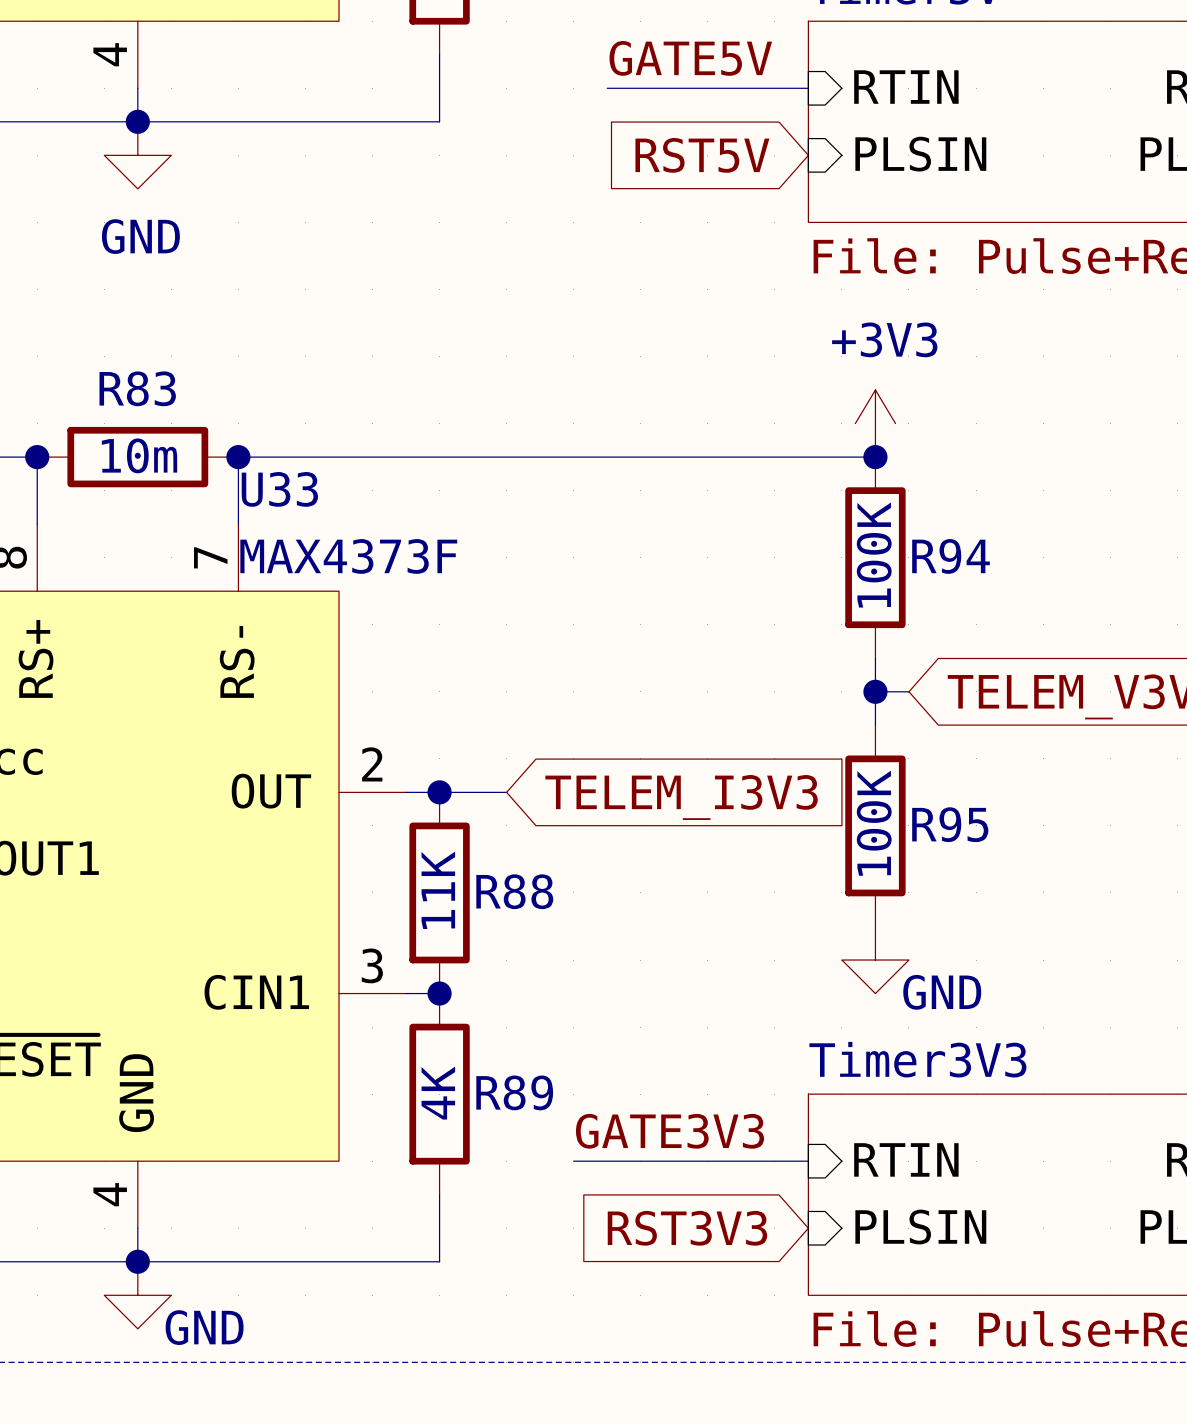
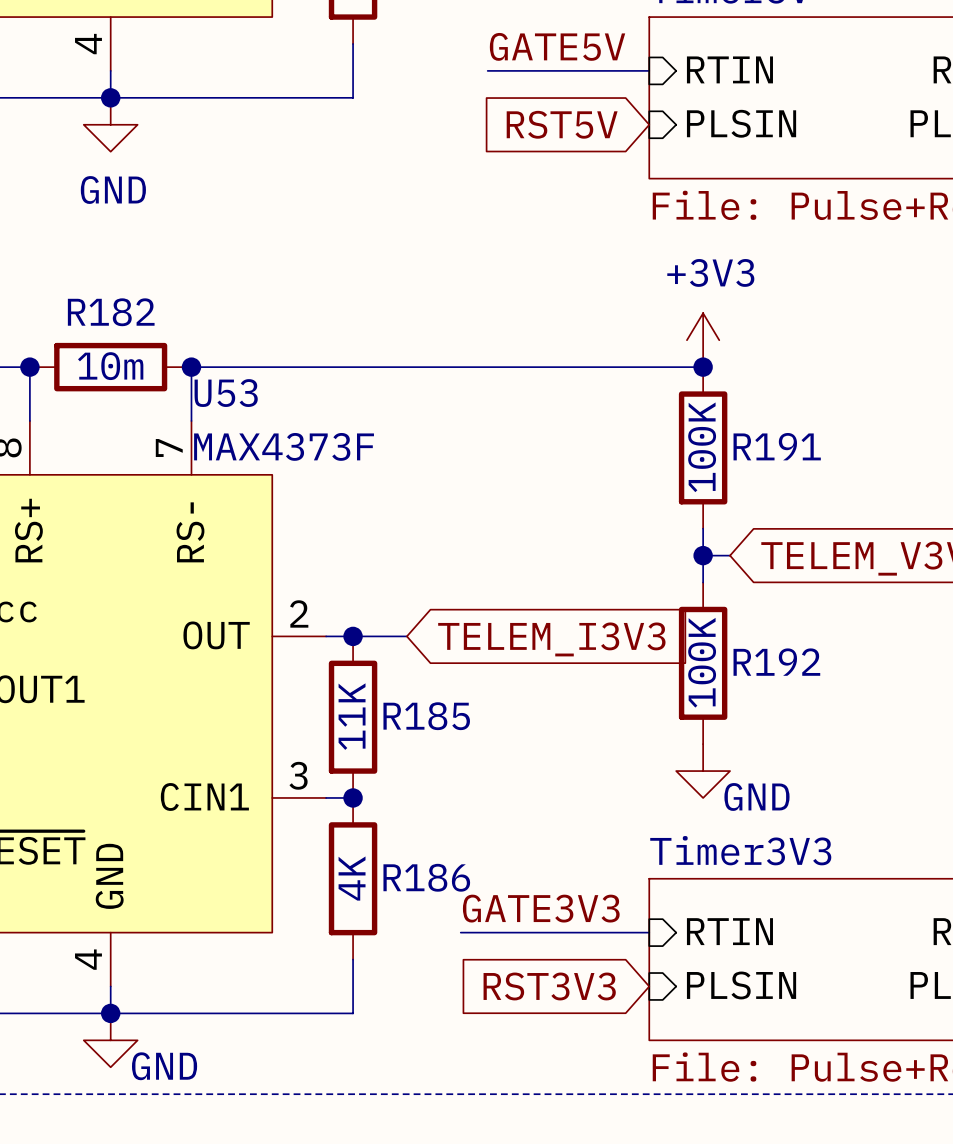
R83 name: R83 (137, 388) -> R182 (111, 312)
U33 name: U33 (279, 489) -> U53 (226, 393)
R94 name: R94 (951, 556) -> R191 (777, 446)
R95 name: R95 (950, 824) -> R192 (776, 662)
R88 name: R88 (514, 891) -> R185 (426, 716)
R89 name: R89 (514, 1092) -> R186 (426, 877)

